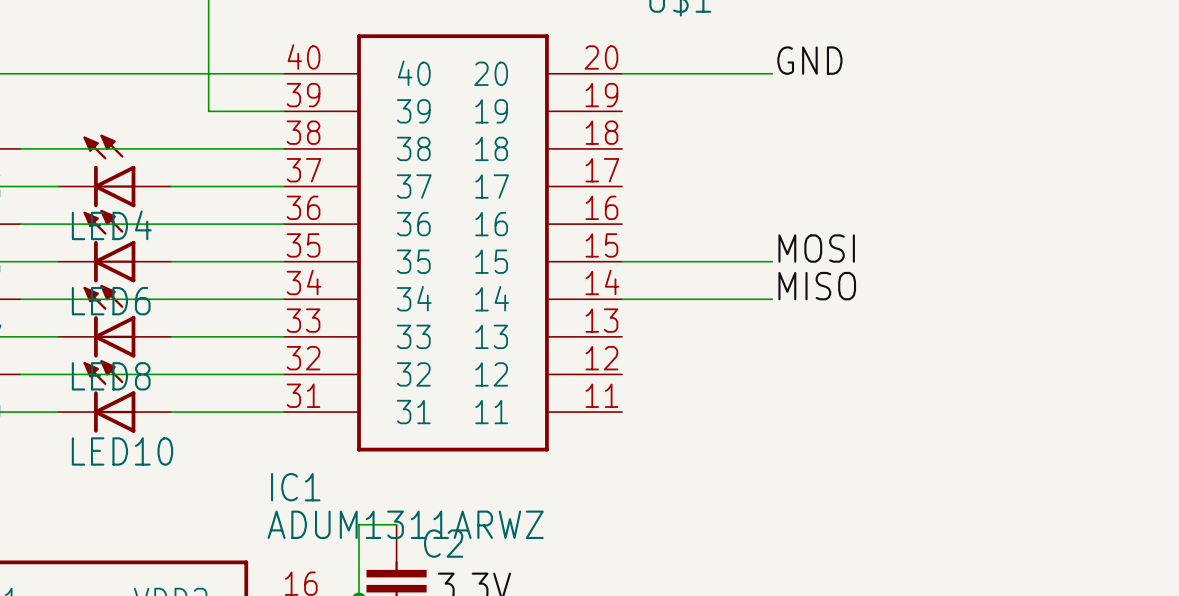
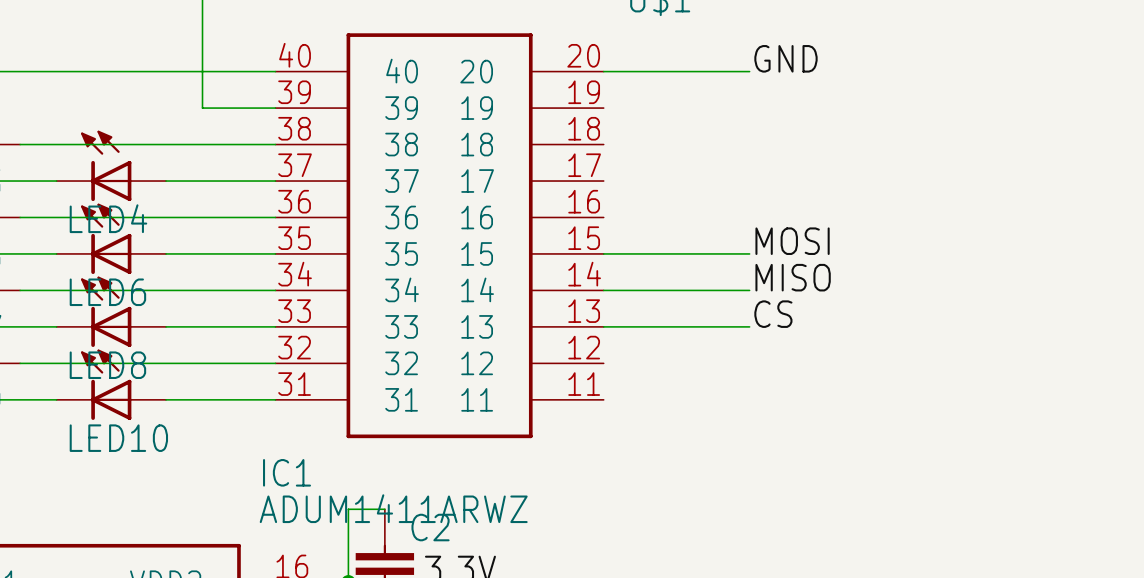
label: none -> CS (773, 314)
wire: none -> (603, 326) (749, 326)
IC1 value: ADUM1311ARWZ (405, 524) -> ADUM1411ARWZ (393, 508)

